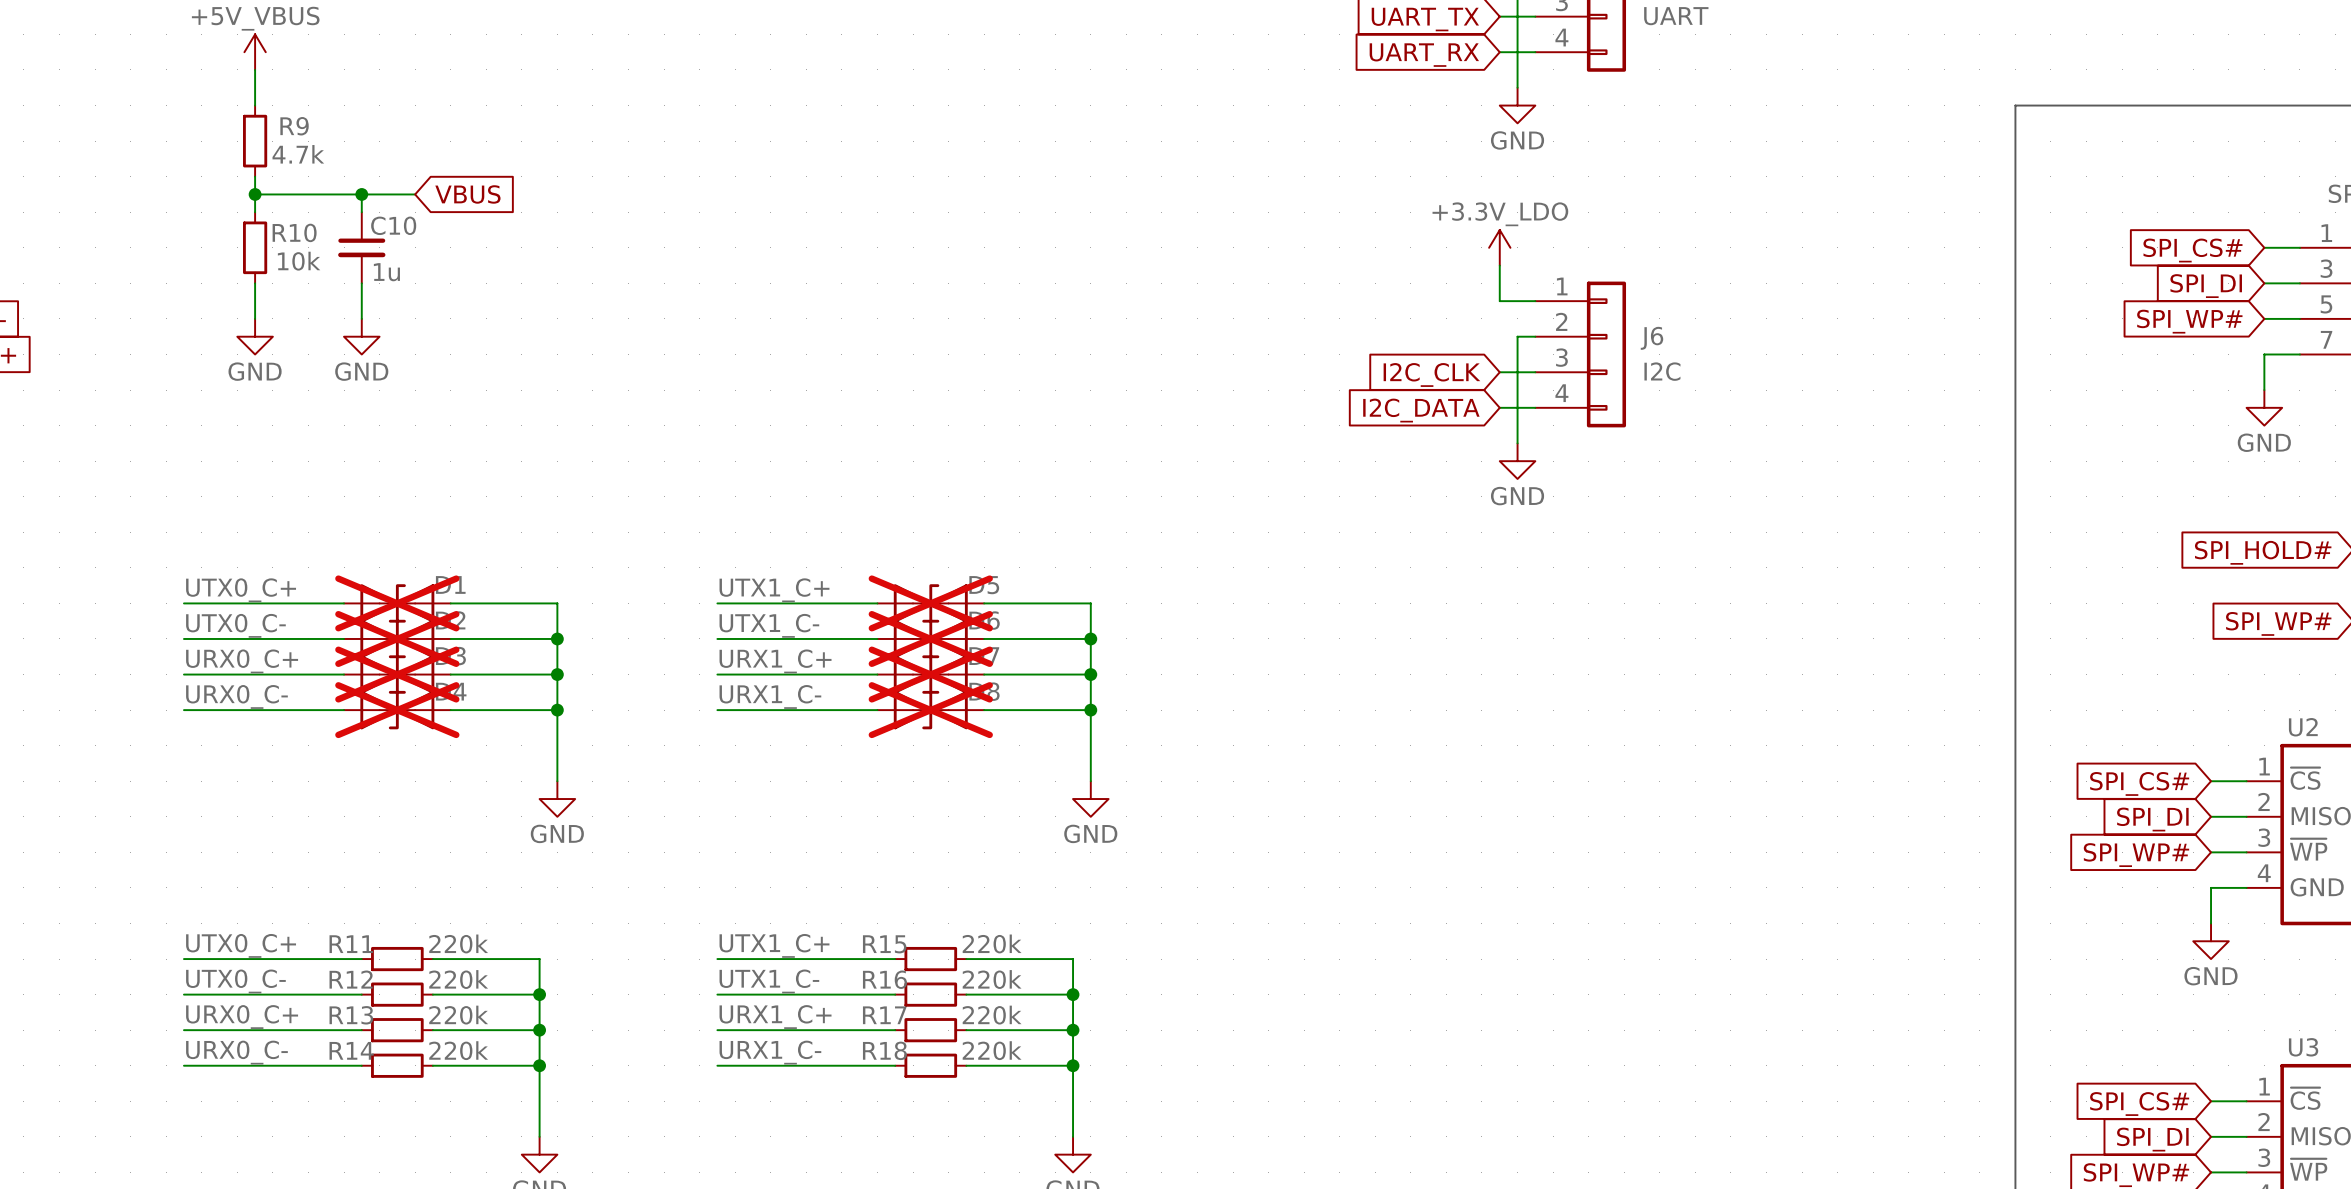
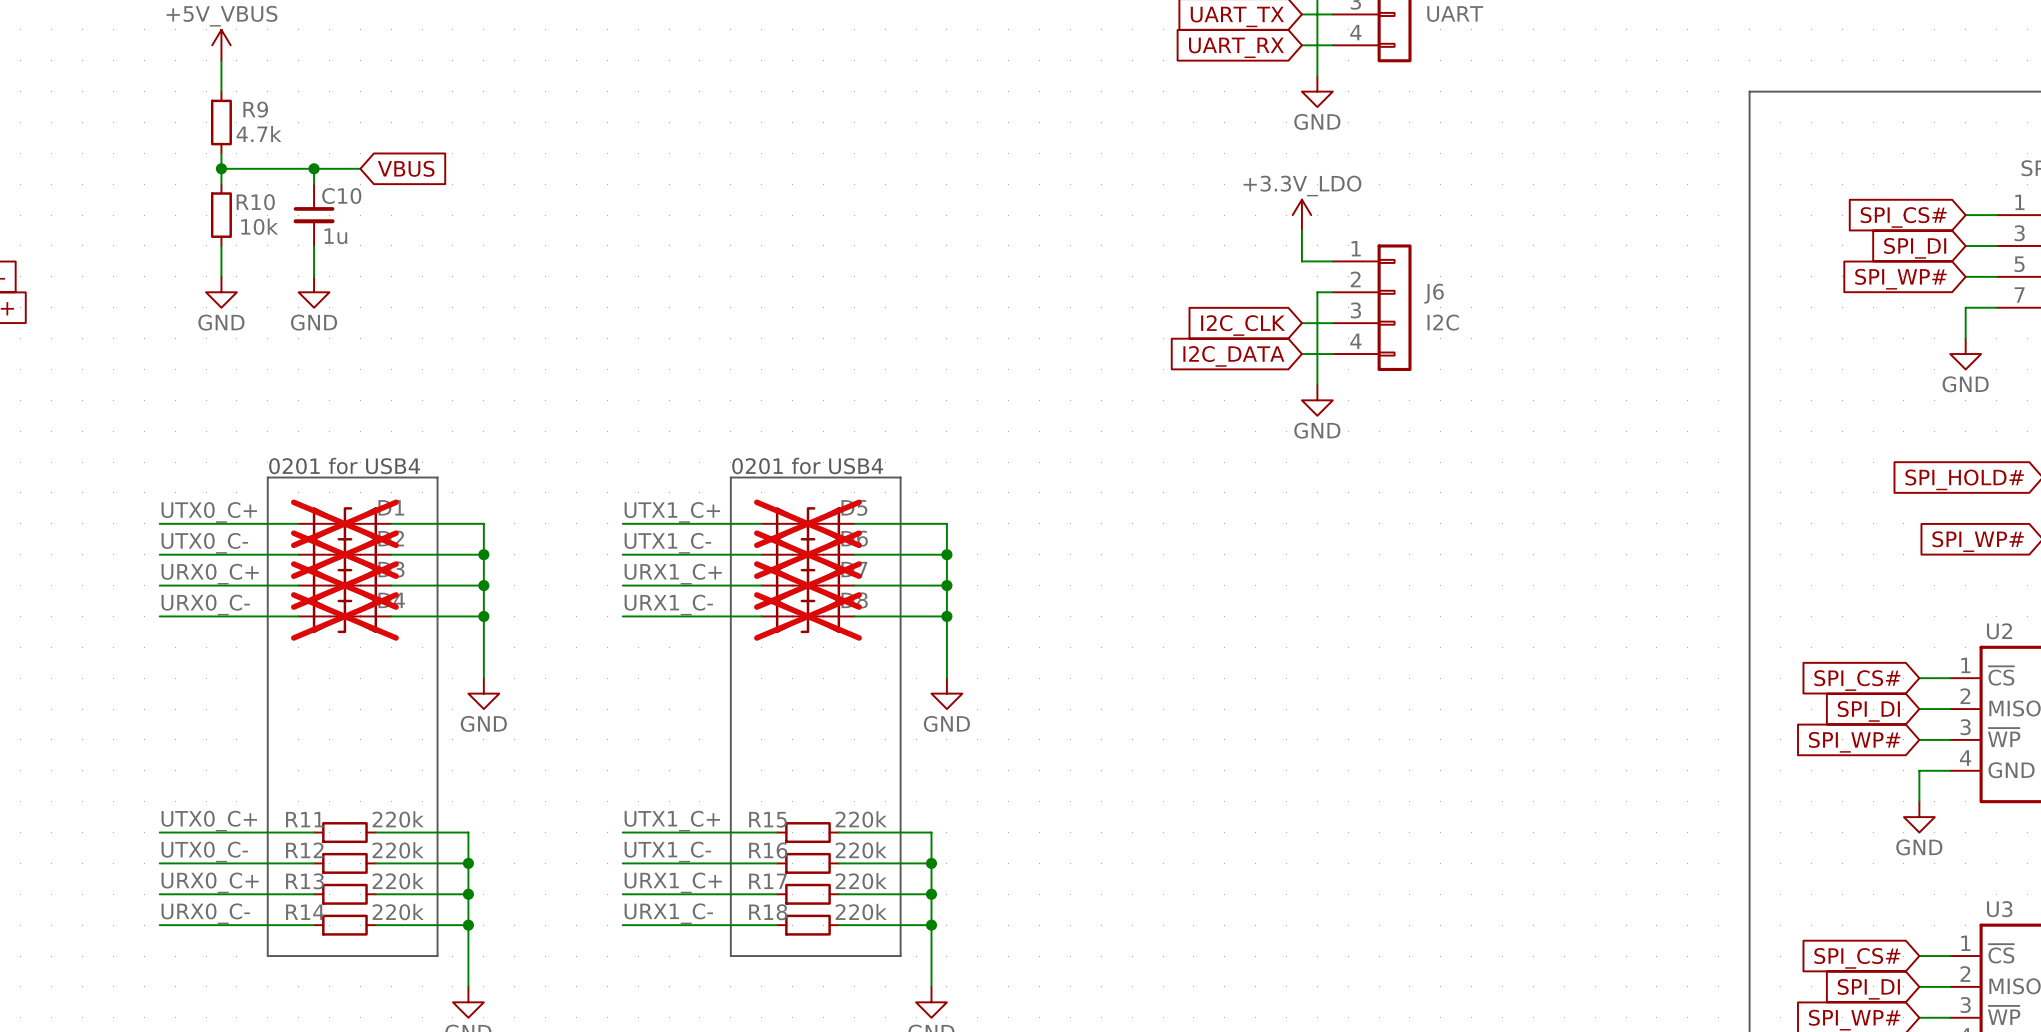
text: none -> 0201 for USB4 (344, 466)
text: none -> 0201 for USB4 (807, 466)
line: none -> (267, 477) (437, 477) (437, 956) (267, 956) (267, 477)
line: none -> (730, 477) (900, 477) (900, 956) (730, 956) (730, 477)

